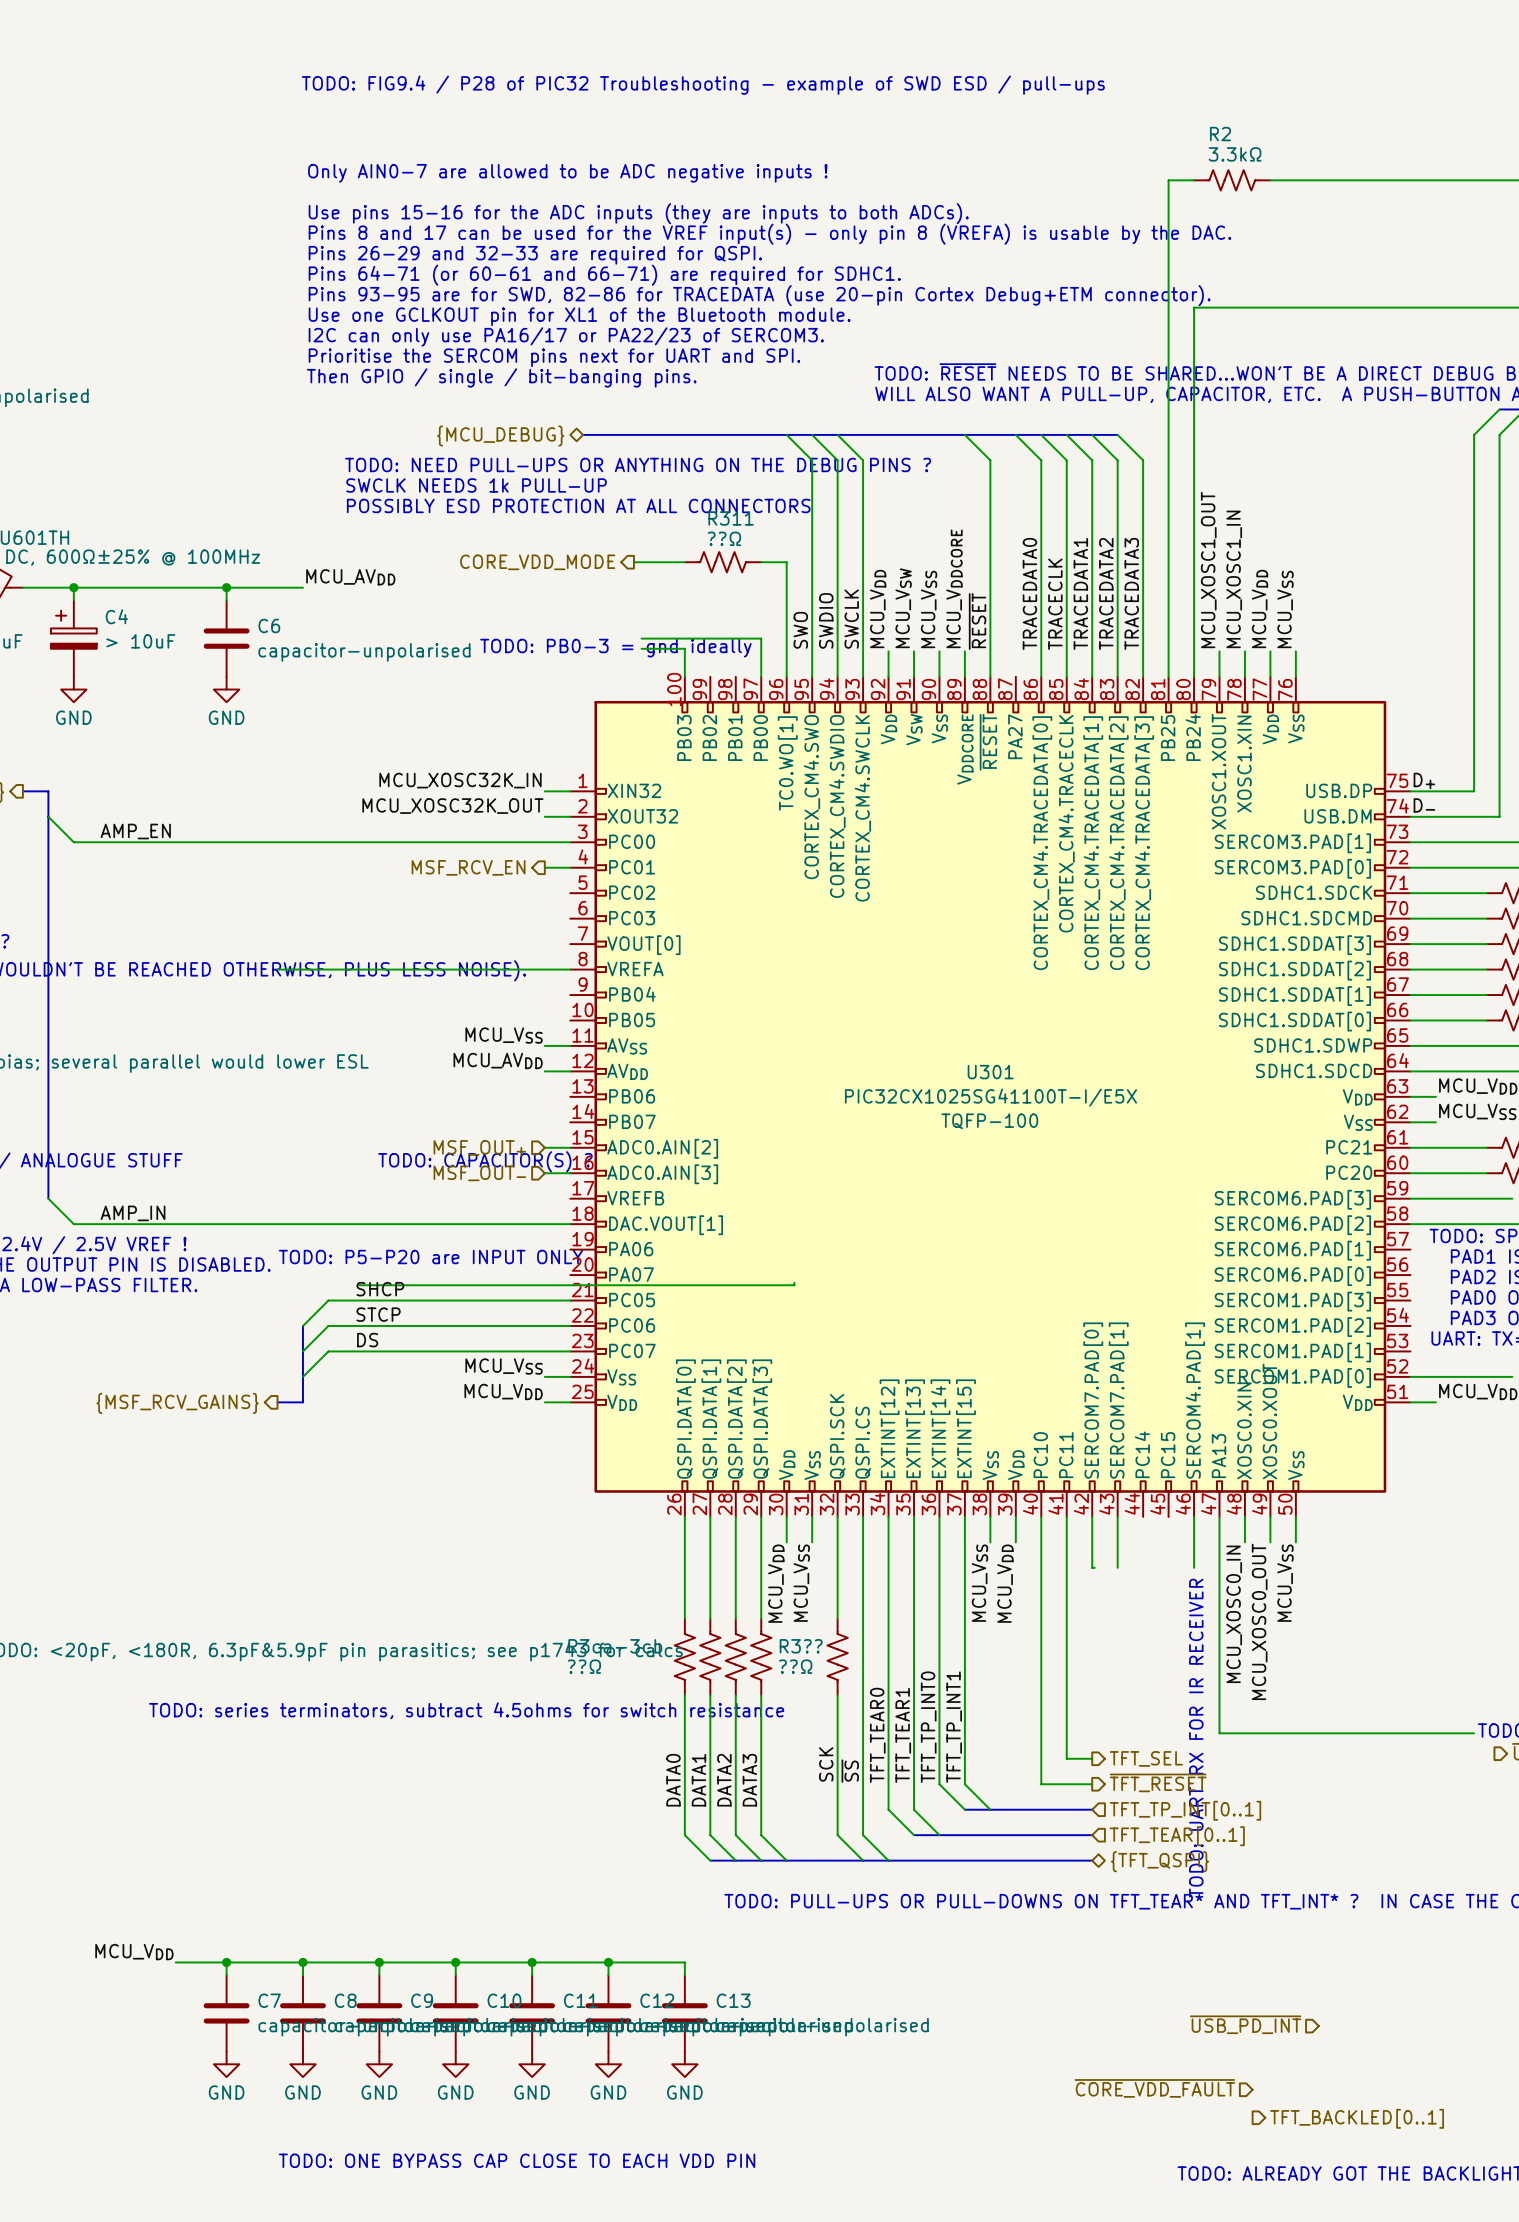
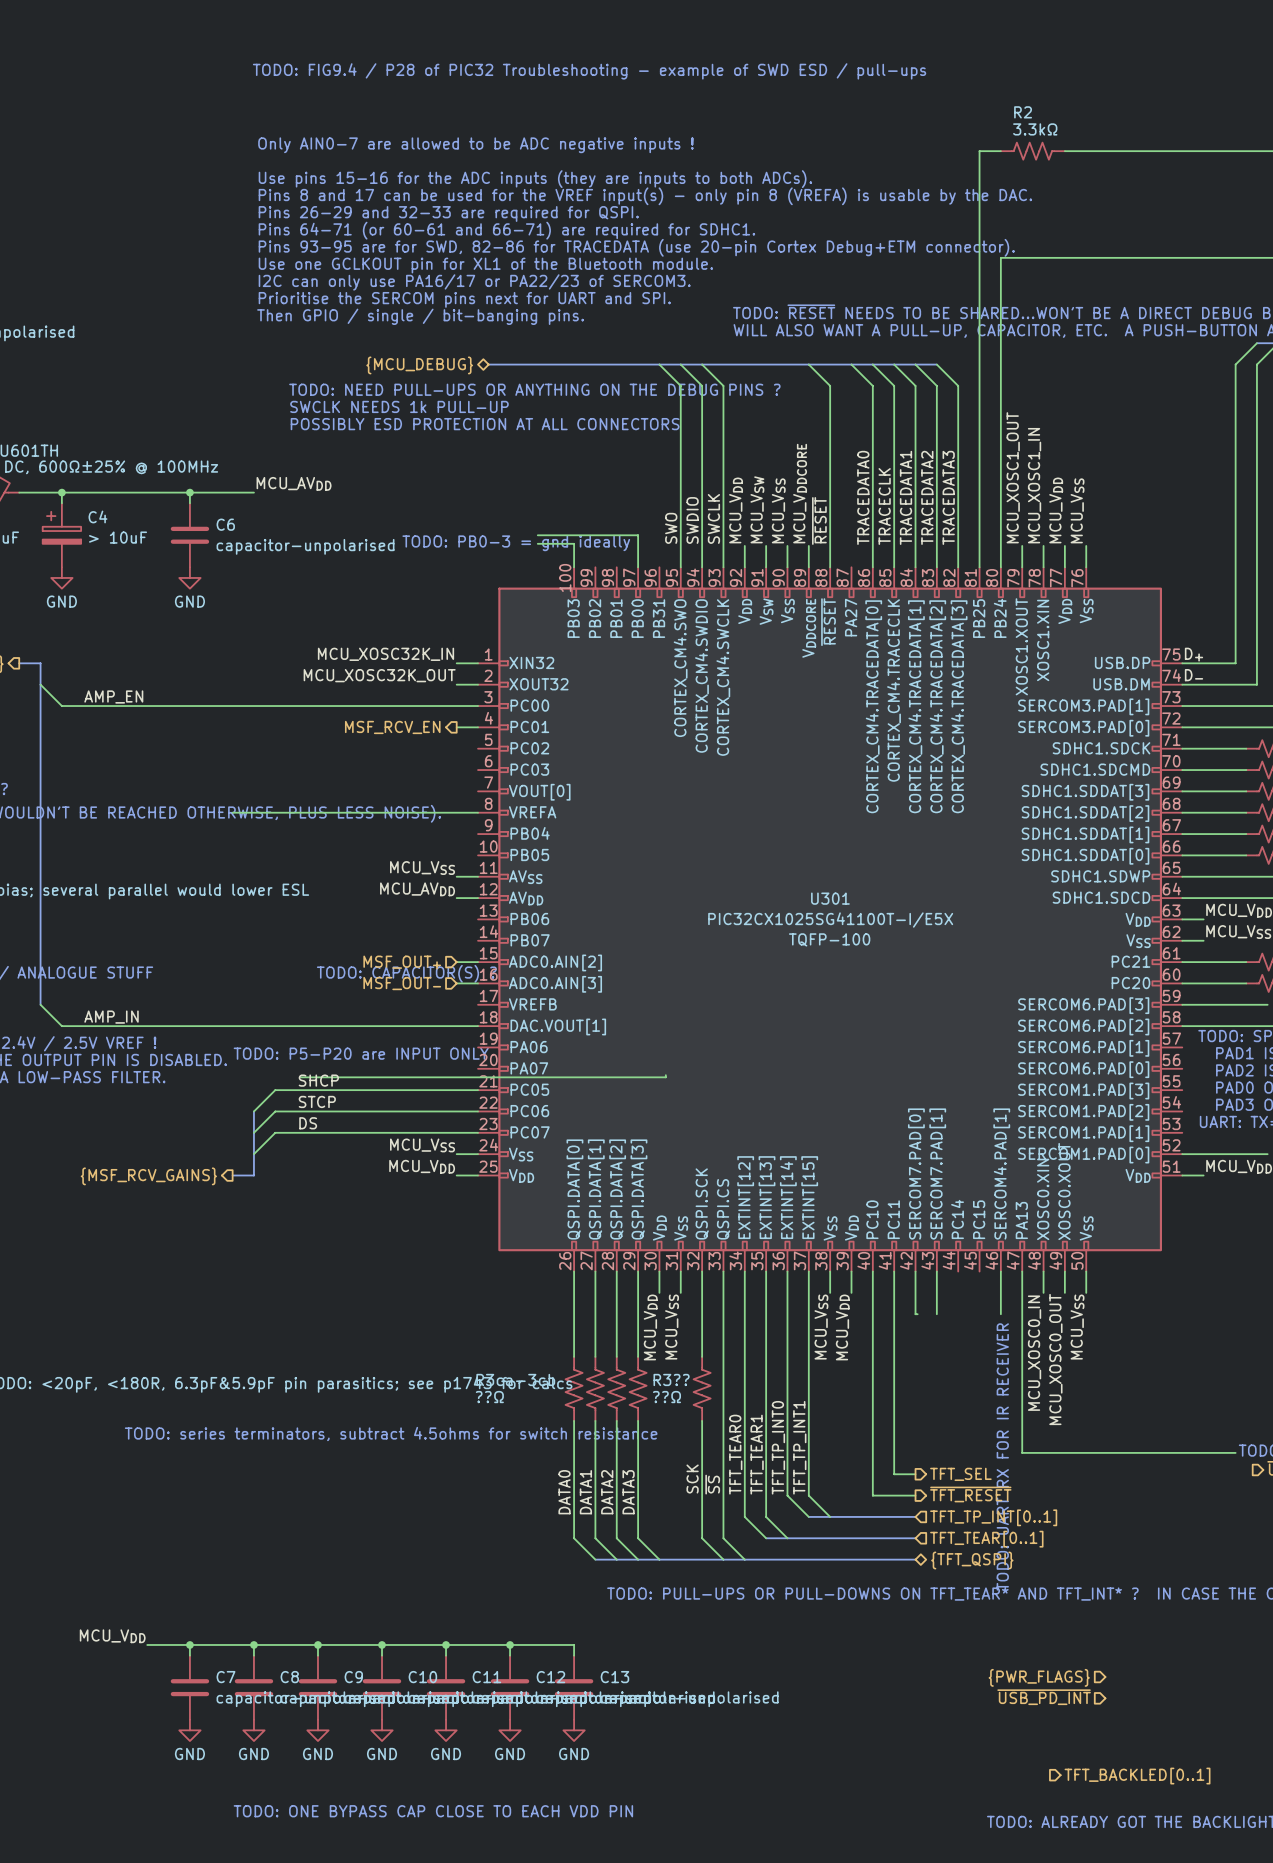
hierarchical label: CORE_VDD_MODE (537, 562) -> none
wire: (633, 562) (684, 562) -> none
R311: ??Ω (723, 562) -> none
wire: (761, 562) (786, 562) (786, 676) -> none
U301 pin name: TC0.WO[1] (787, 763) -> PB31 (659, 618)
hierarchical label: none -> {PWR_FLAGS} (1039, 1677)
hierarchical label: ~{CORE_VDD_FAULT} (1154, 2088) -> none

